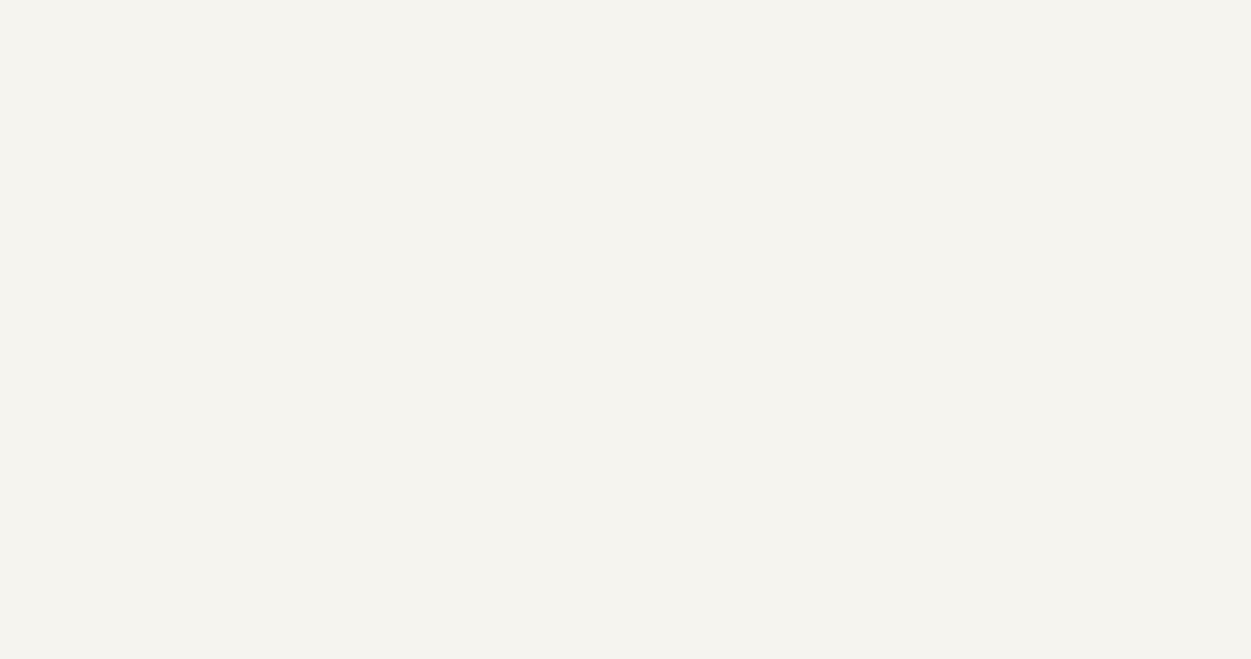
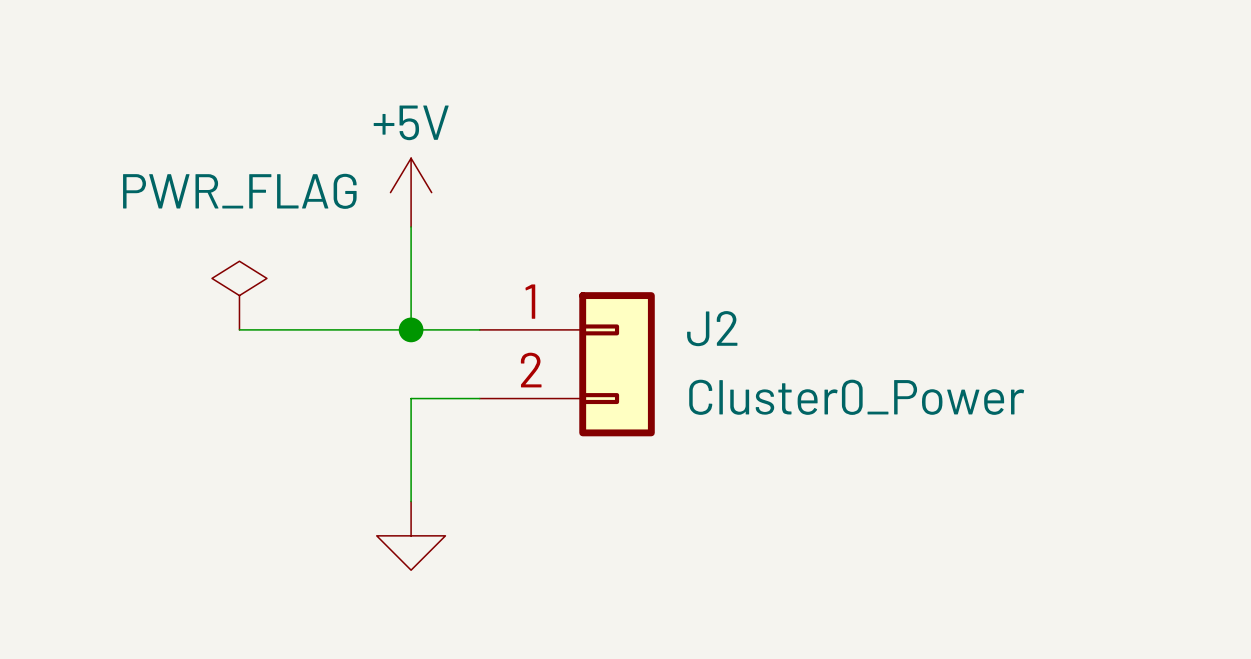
power symbol: none -> +5V (411, 192)
wire: none -> (411, 226) (411, 329)
power symbol: none -> PWR_FLAG (239, 295)
wire: none -> (239, 329) (479, 329)
junction: none -> (411, 329)
J2: none -> Cluster0_Power (567, 364)
wire: none -> (479, 398) (411, 398) (411, 501)
power symbol: none -> (411, 535)

